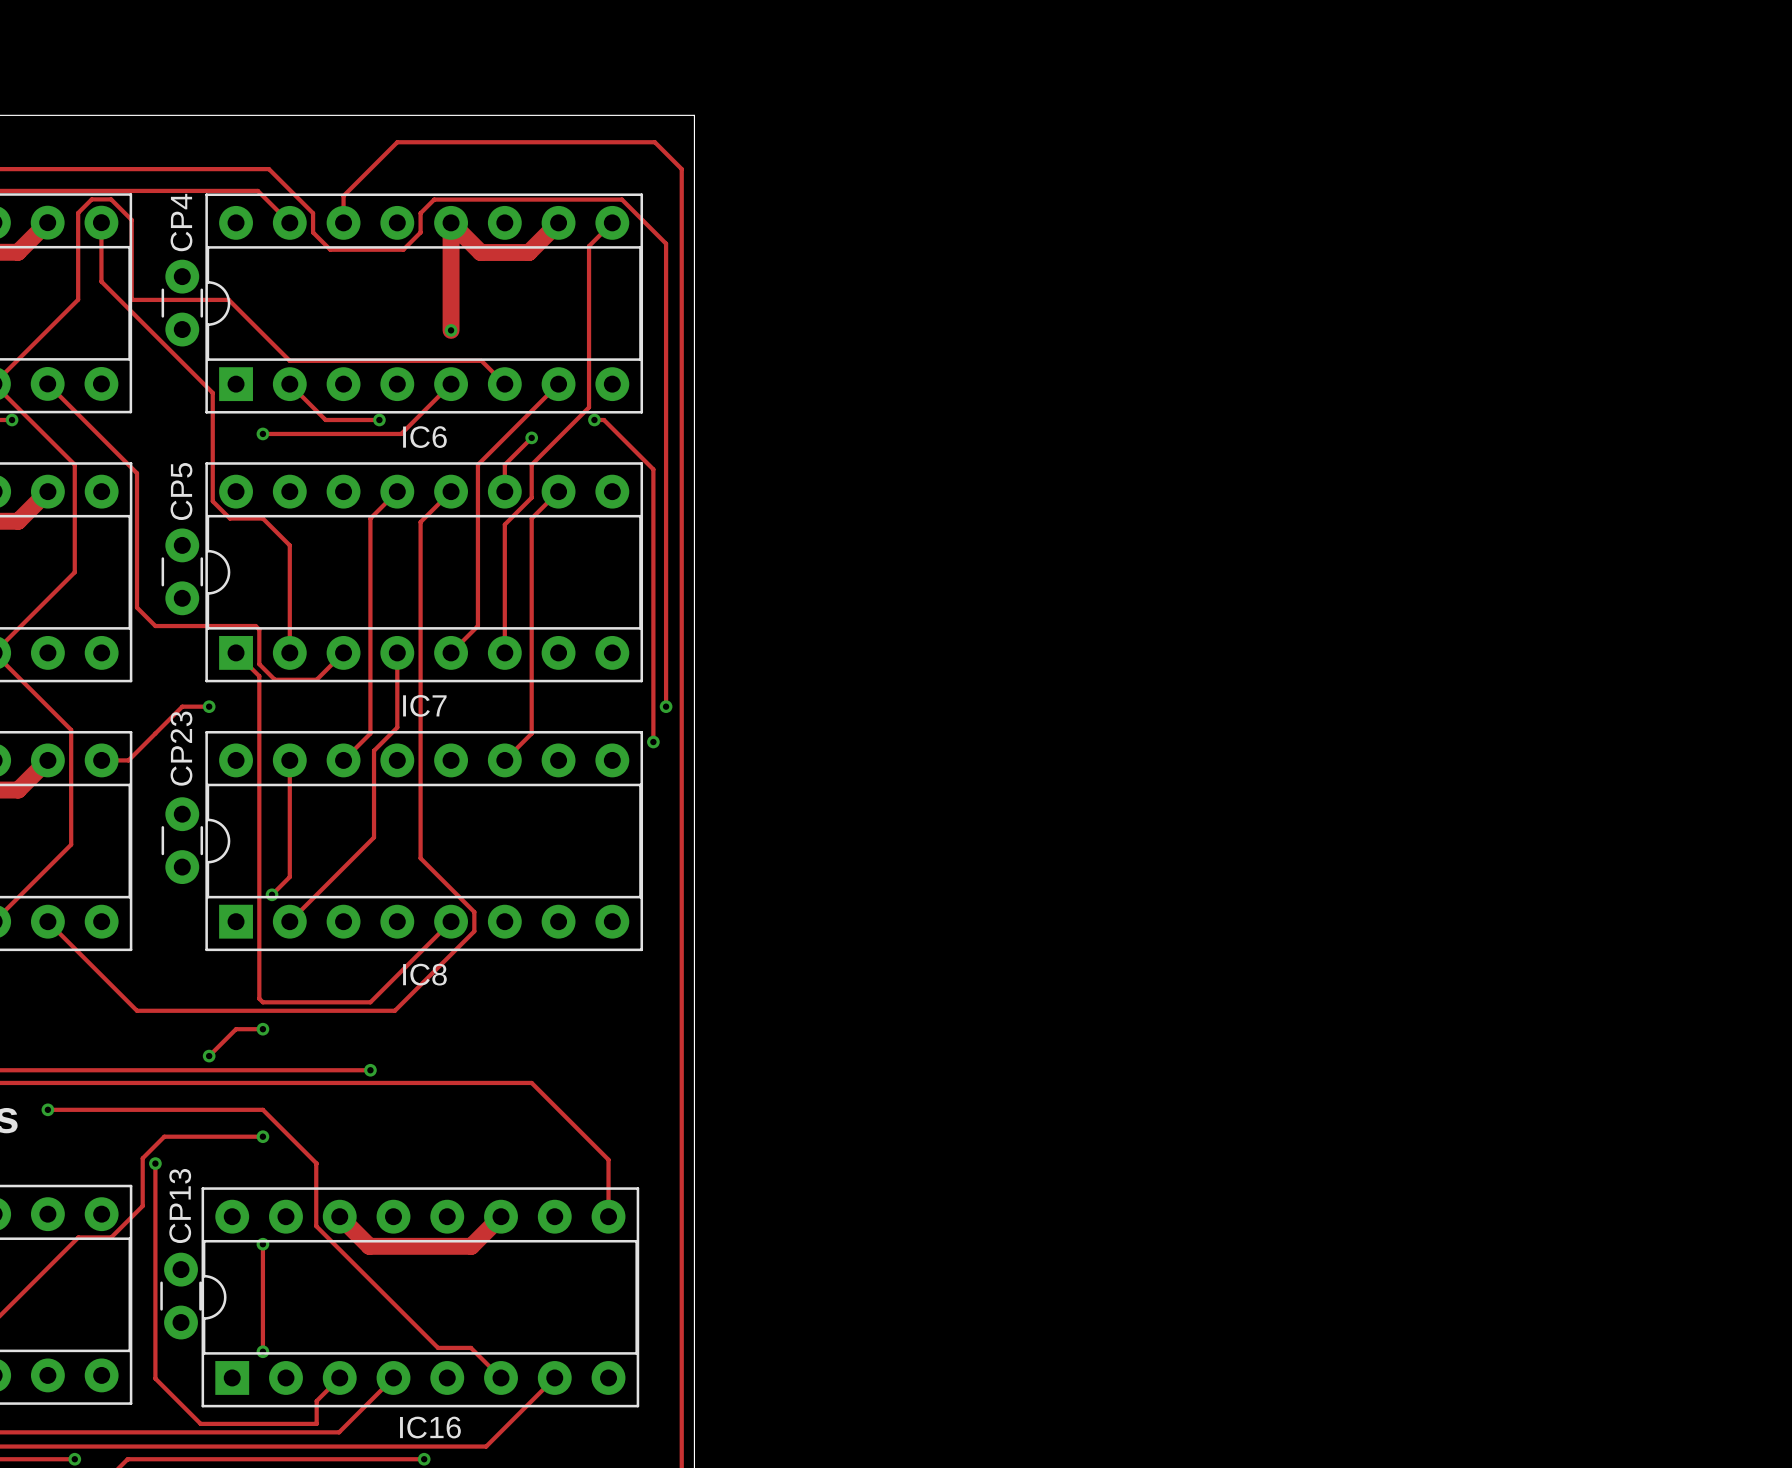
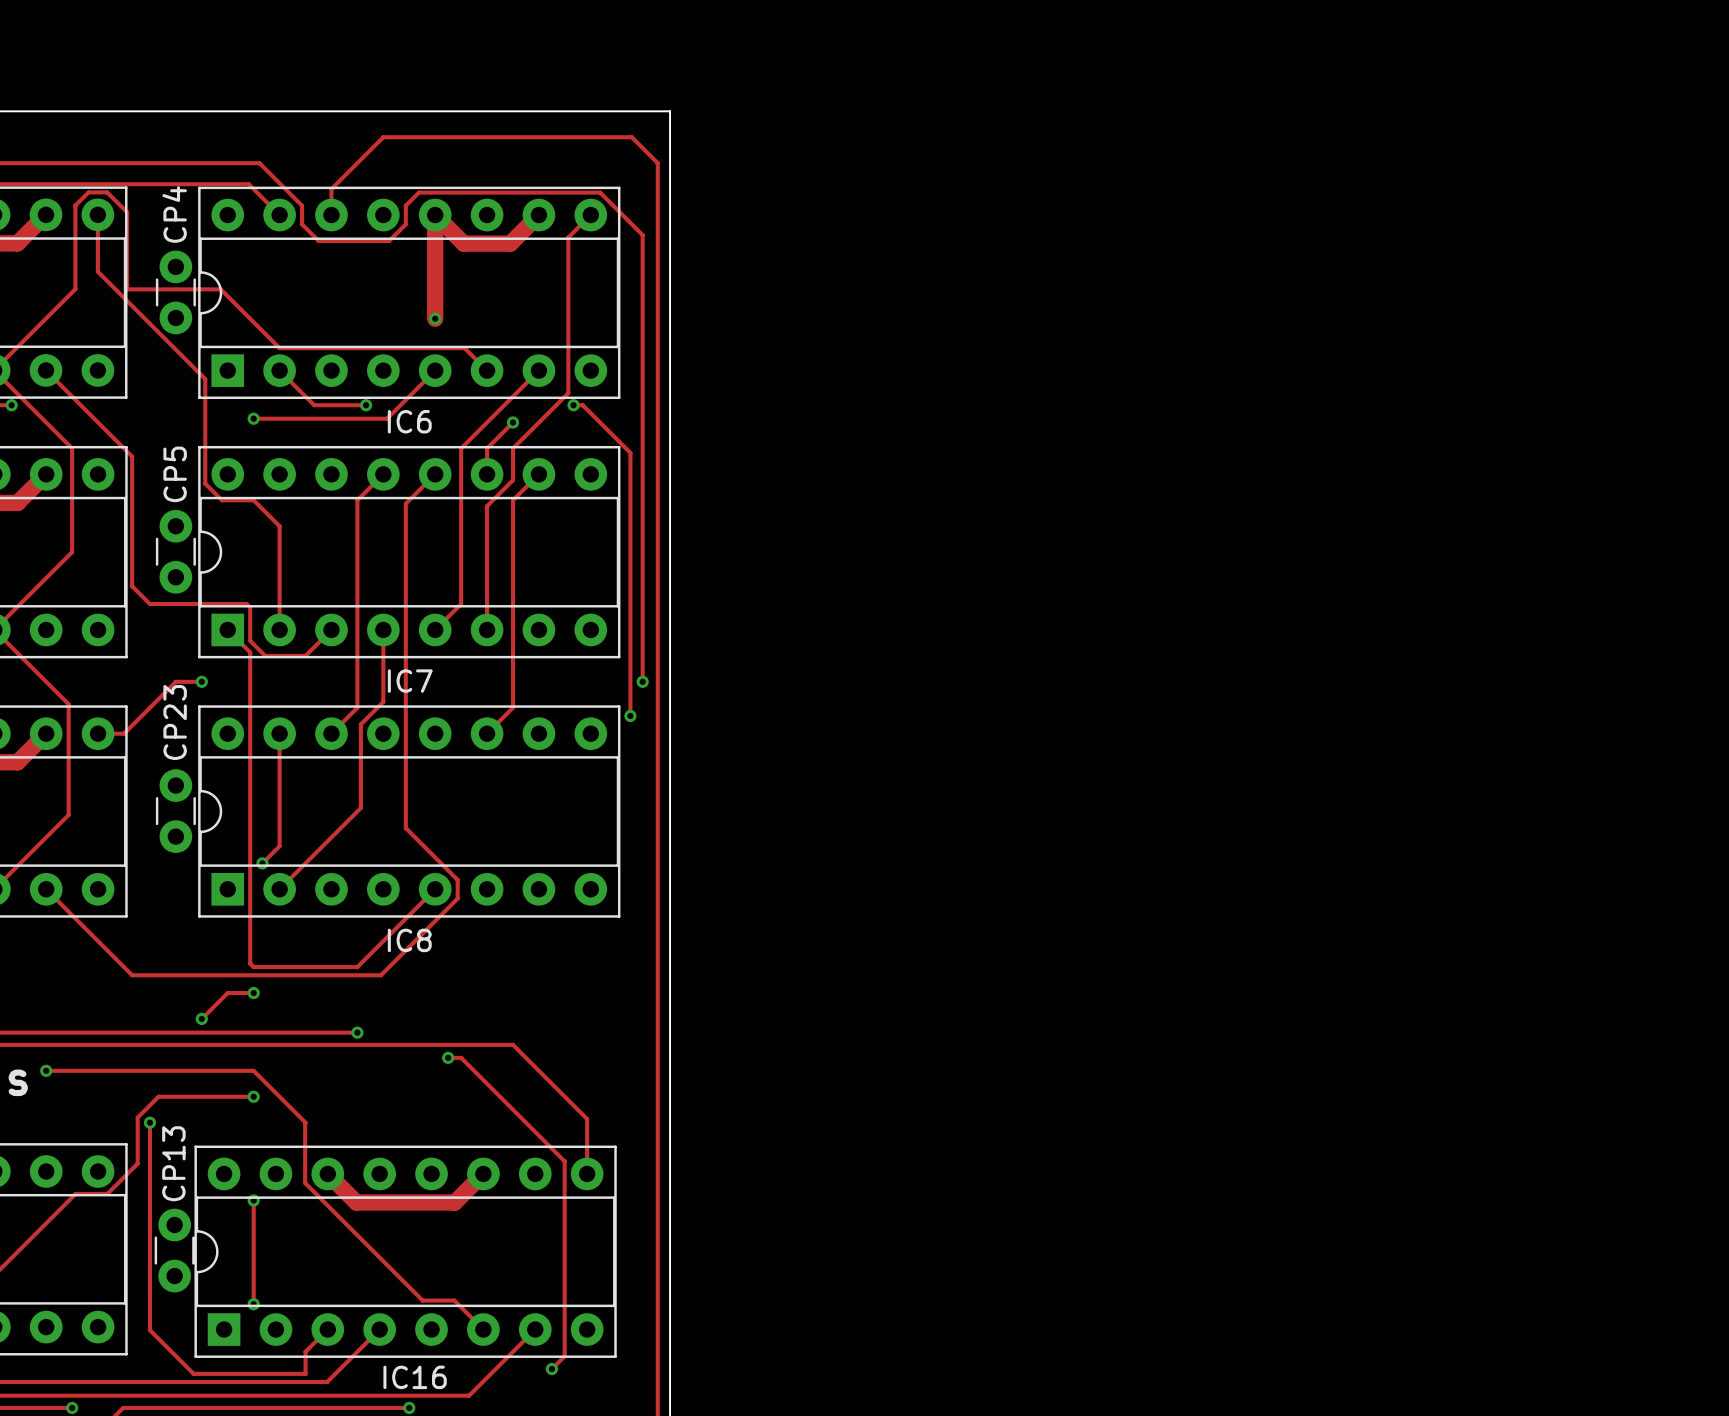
track: none -> (448, 1057) (461, 1057) (564, 1161) (564, 1356) (551, 1369)
via: none -> (448, 1057)
via: none -> (551, 1369)

